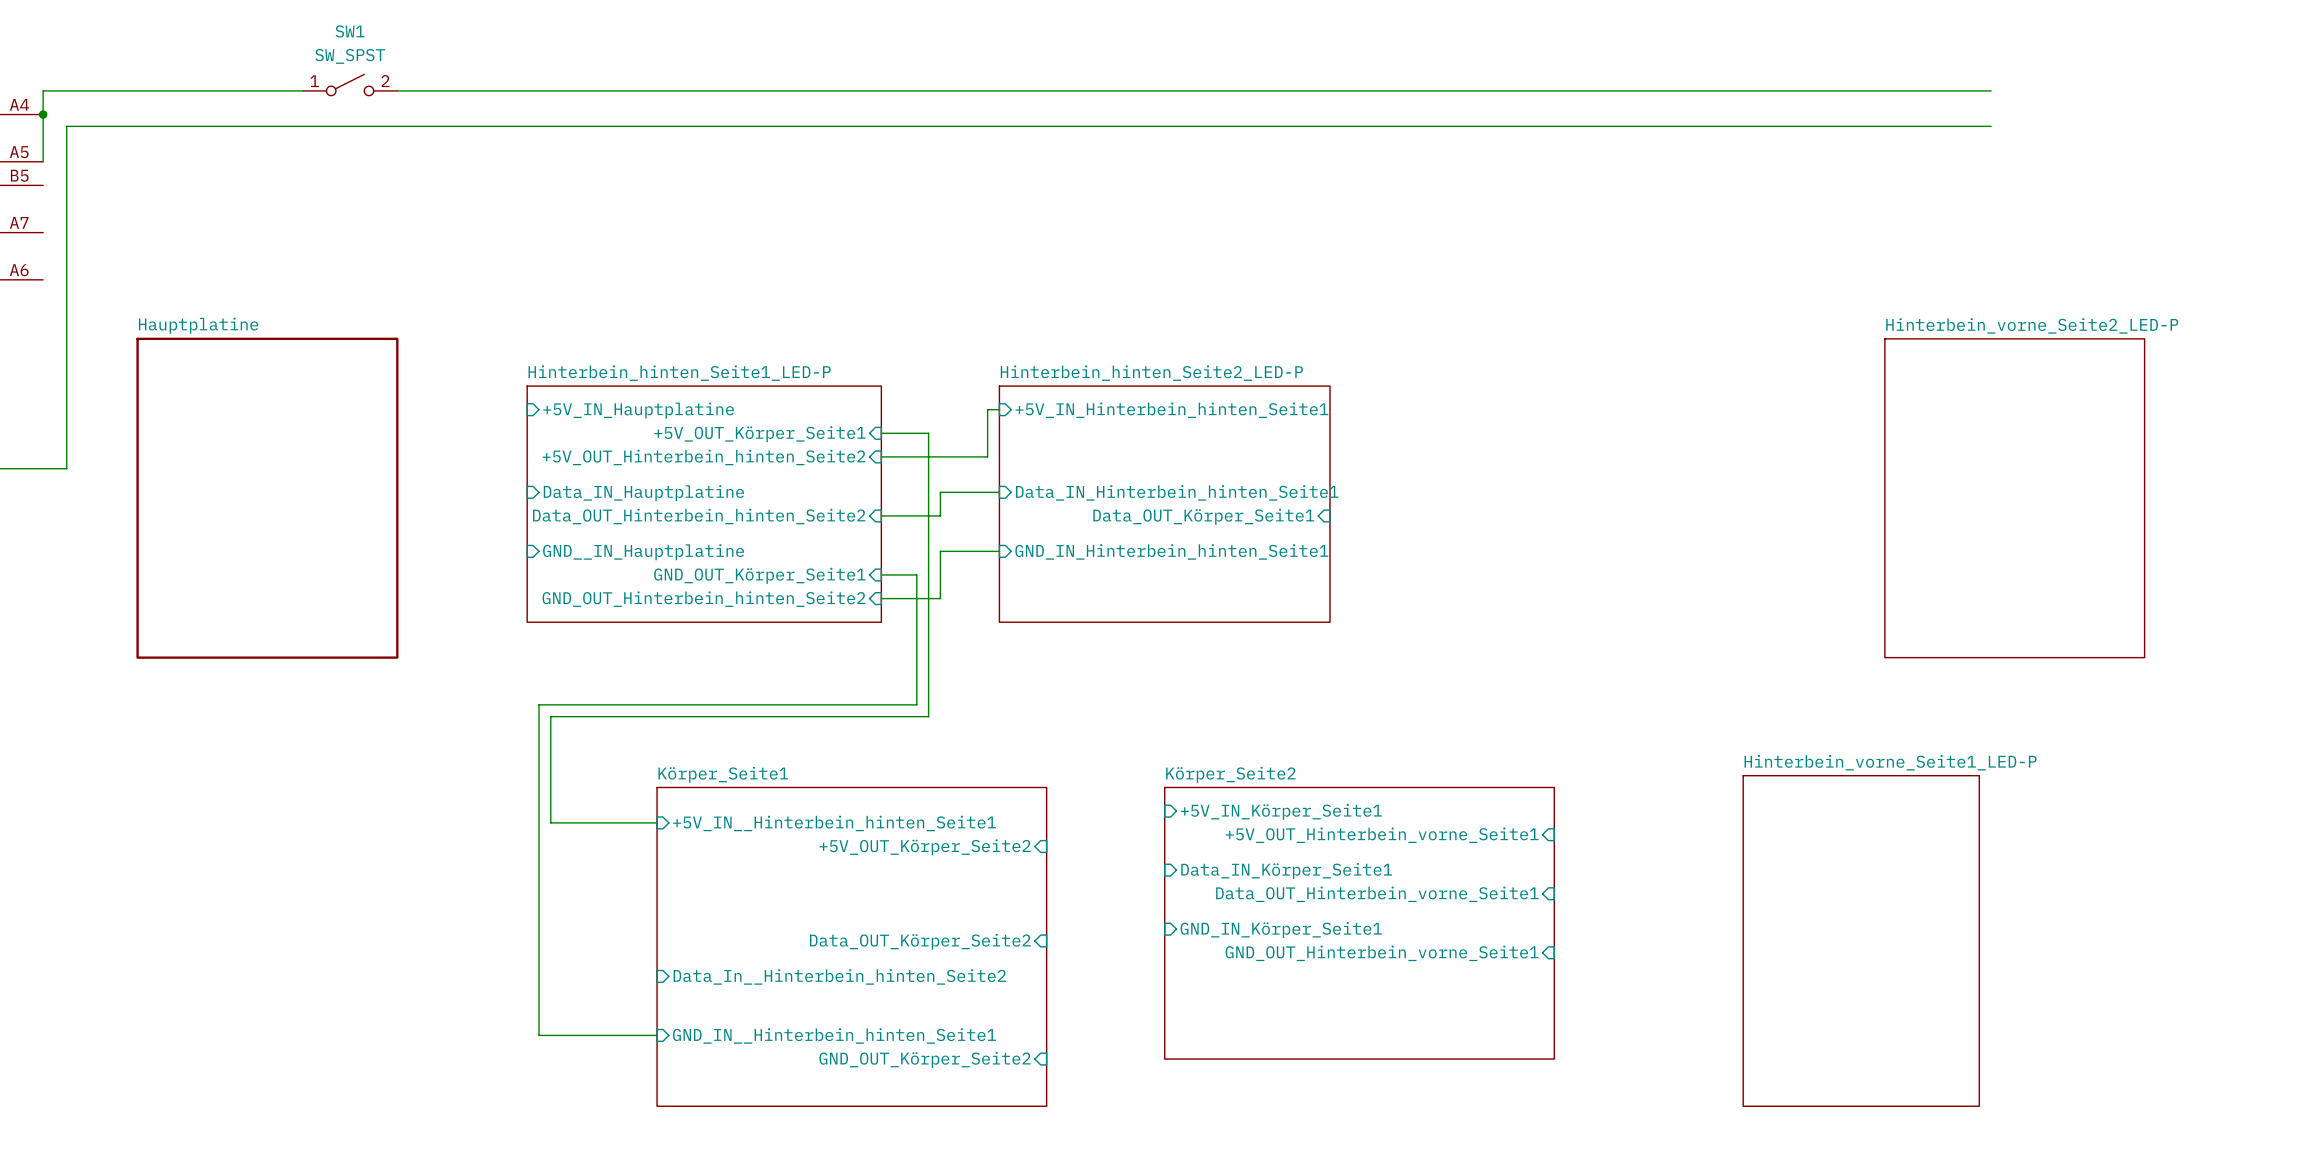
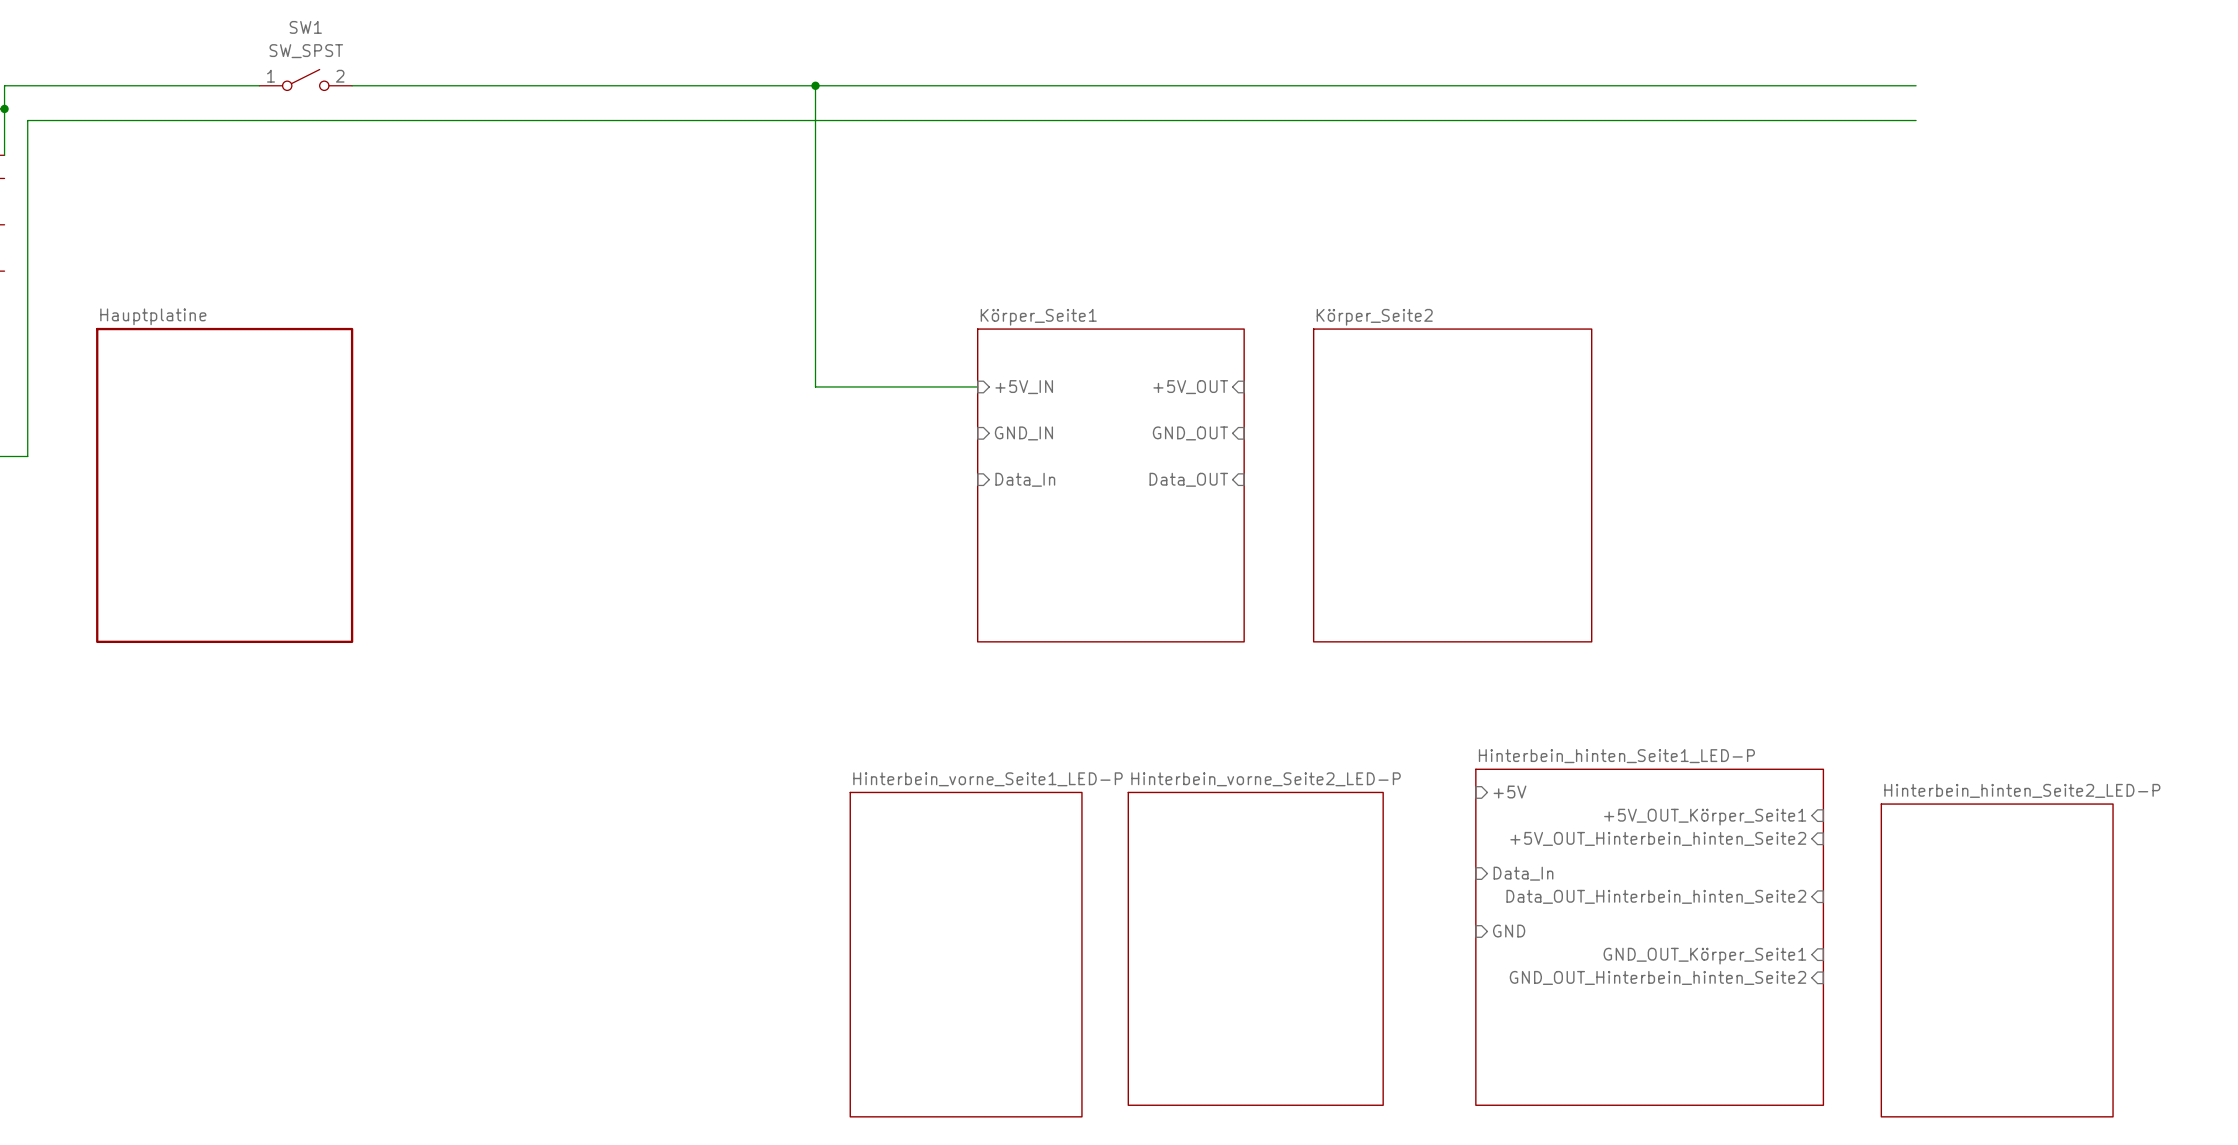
wire: none -> (815, 85) (815, 386) (977, 386)
junction: none -> (815, 85)
sheet Hinterbein_hinten_Seite1_LED-P name position: Hinterbein_hinten_Seite1_LED-P (679, 373) -> Hinterbein_hinten_Seite1_LED-P (1616, 756)
sheet Hinterbein_hinten_Seite2_LED-P name position: Hinterbein_hinten_Seite2_LED-P (1151, 373) -> Hinterbein_hinten_Seite2_LED-P (2022, 790)
sheet Hinterbein_hinten_Seite1_LED-P shape: [526, 385, 883, 623] -> [1475, 768, 1825, 1106]
sheet Hinterbein_hinten_Seite2_LED-P shape: [998, 385, 1331, 623] -> [1880, 803, 2114, 1118]
sheet pin: none -> +5V_IN (1024, 387)
sheet pin: none -> +5V_OUT (1190, 387)
wire: (999, 409) (987, 409) (987, 456) (881, 456) -> none
sheet pin: +5V_IN_Hauptplatine (638, 410) -> none
sheet pin: +5V_IN_Hinterbein_hinten_Seite1 (1171, 410) -> none
wire: (881, 433) (928, 433) (928, 716) (550, 716) (550, 822) (657, 822) -> none
sheet pin: +5V_OUT_Körper_Seite1 (759, 434) -> none
sheet pin: none -> GND_IN (1023, 433)
sheet pin: none -> GND_OUT (1190, 433)
sheet pin: +5V_OUT_Hinterbein_hinten_Seite2 (703, 457) -> none
wire: (999, 492) (940, 492) (940, 515) (881, 515) -> none
sheet pin: Data_IN_Hinterbein_hinten_Seite1 (1177, 492) -> none
sheet pin: Data_IN_Hauptplatine (643, 493) -> none
sheet pin: none -> Data_In (1025, 479)
sheet pin: none -> Data_OUT (1188, 479)
sheet Hinterbein_vorne_Seite2_LED-P position: (2014, 498) -> (1255, 948)
sheet pin: Data_OUT_Hinterbein_hinten_Seite2 (699, 516) -> none
sheet pin: Data_OUT_Körper_Seite1 (1203, 516) -> none
wire: (999, 551) (940, 551) (940, 598) (881, 598) -> none
sheet pin: GND_IN_Hinterbein_hinten_Seite1 (1171, 551) -> none
sheet pin: GND__IN_Hauptplatine (643, 552) -> none
wire: (881, 574) (916, 574) (916, 704) (538, 704) (538, 1035) (657, 1035) -> none
sheet pin: GND_OUT_Körper_Seite1 (759, 575) -> none
sheet pin: GND_OUT_Hinterbein_hinten_Seite2 (703, 599) -> none
sheet Körper_Seite1 name position: Körper_Seite1 (723, 774) -> Körper_Seite1 (1038, 317)
sheet Körper_Seite2 name position: Körper_Seite2 (1230, 774) -> Körper_Seite2 (1374, 317)
sheet Körper_Seite1 shape: [656, 786, 1048, 1107] -> [977, 328, 1245, 643]
sheet Körper_Seite2 shape: [1164, 786, 1556, 1060] -> [1312, 328, 1593, 643]
sheet pin: none -> +5V (1509, 792)
sheet pin: +5V_IN_Körper_Seite1 (1281, 811) -> none
sheet pin: +5V_IN__Hinterbein_hinten_Seite1 (834, 823) -> none
sheet pin: +5V_OUT_Hinterbein_vorne_Seite1 (1382, 835) -> none
sheet pin: none -> +5V_OUT_Körper_Seite1 (1705, 817)
sheet pin: +5V_OUT_Körper_Seite2 (925, 847) -> none
sheet pin: none -> +5V_OUT_Hinterbein_hinten_Seite2 (1658, 838)
sheet pin: Data_IN_Körper_Seite1 (1286, 870) -> none
sheet pin: Data_OUT_Hinterbein_vorne_Seite1 (1377, 894) -> none
sheet pin: none -> Data_In (1523, 873)
sheet pin: none -> Data_OUT_Hinterbein_hinten_Seite2 (1656, 896)
sheet pin: GND_IN_Körper_Seite1 (1281, 929) -> none
sheet Hinterbein_vorne_Seite1_LED-P position: (1861, 940) -> (966, 954)
sheet pin: Data_OUT_Körper_Seite2 (920, 941) -> none
sheet pin: none -> GND (1509, 931)
sheet pin: GND_OUT_Hinterbein_vorne_Seite1 (1382, 953) -> none
sheet pin: Data_In__Hinterbein_hinten_Seite2 (839, 976) -> none
sheet pin: none -> GND_OUT_Körper_Seite1 (1704, 956)
sheet pin: none -> GND_OUT_Hinterbein_hinten_Seite2 (1657, 977)
sheet pin: GND_IN__Hinterbein_hinten_Seite1 (834, 1035) -> none
sheet pin: GND_OUT_Körper_Seite2 (925, 1059) -> none

